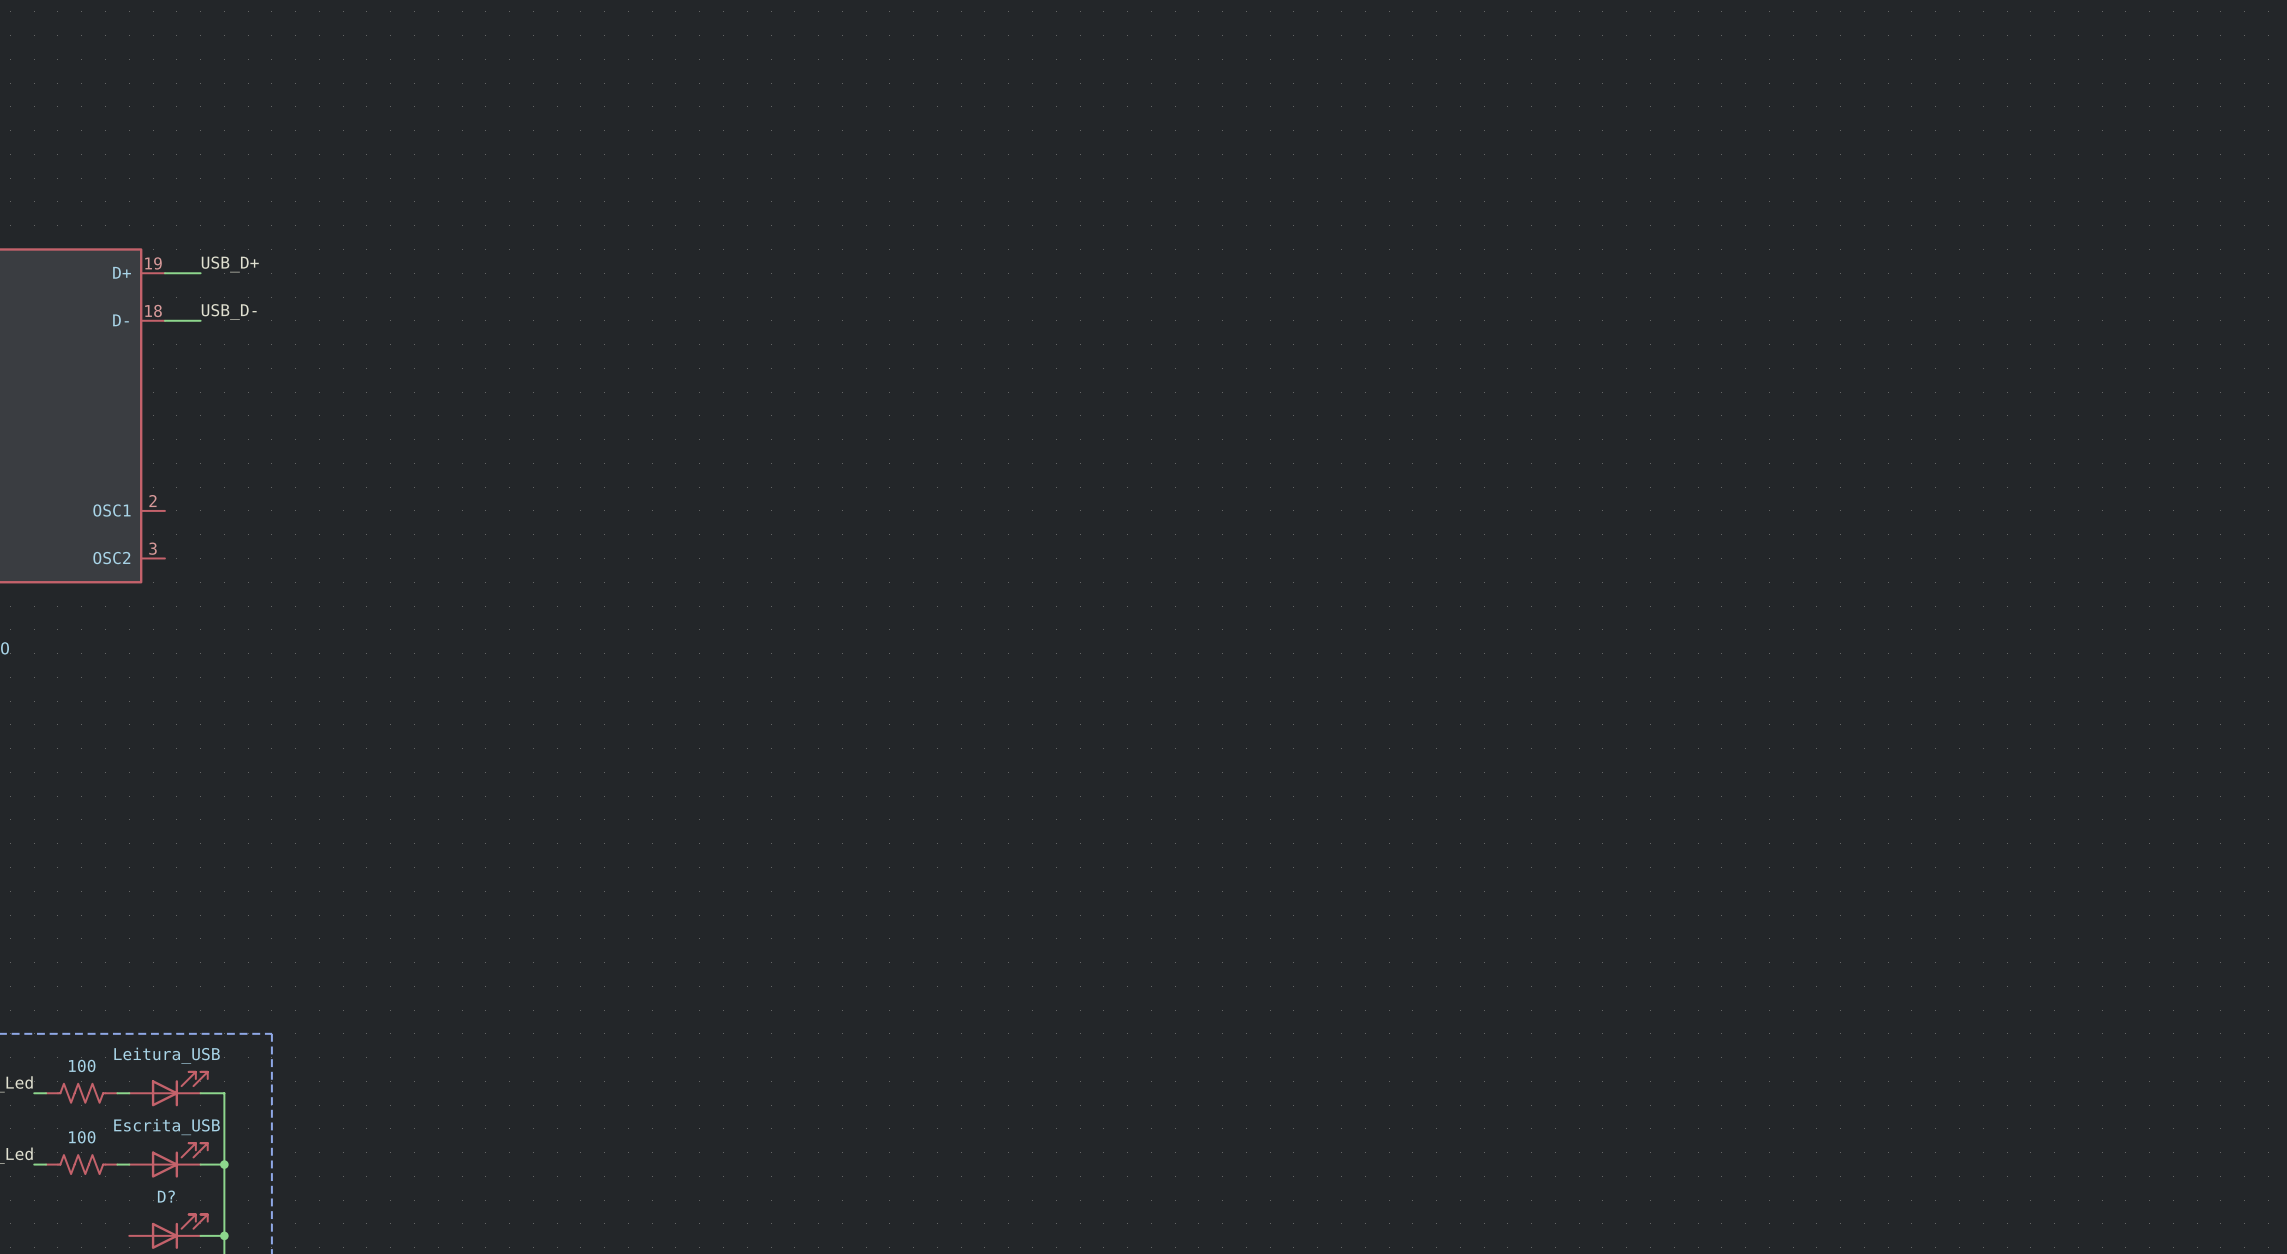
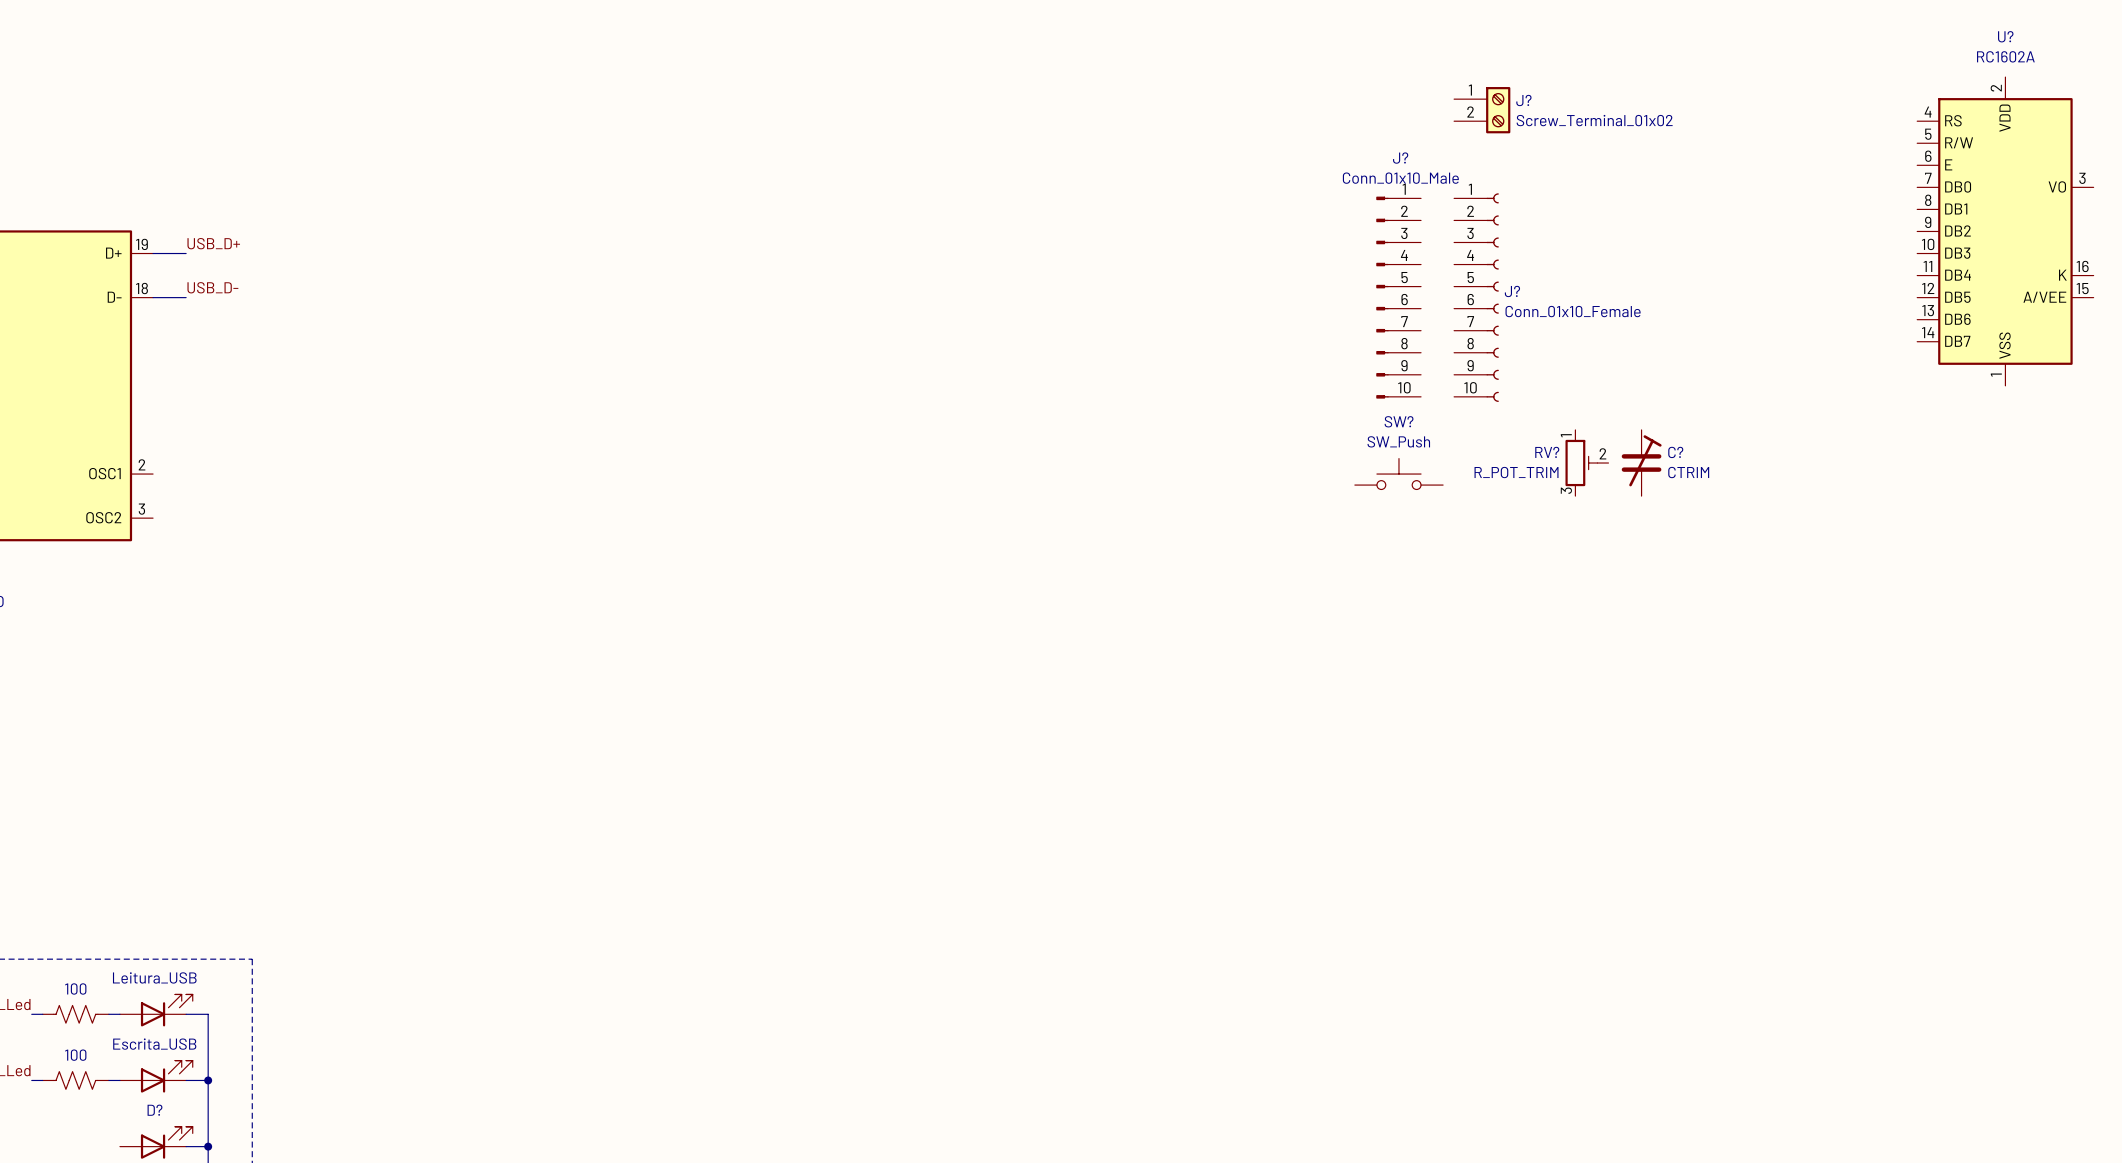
J?: none -> Screw_Terminal_01x02 (1482, 110)
U?: none -> RC1602A (2005, 231)
J?: none -> Conn_01x10_Male (1398, 297)
J?: none -> Conn_01x10_Female (1476, 297)
RV?: none -> R_POT_TRIM (1586, 463)
C?: none -> CTRIM (1641, 463)
SW?: none -> SW_Push (1398, 474)

